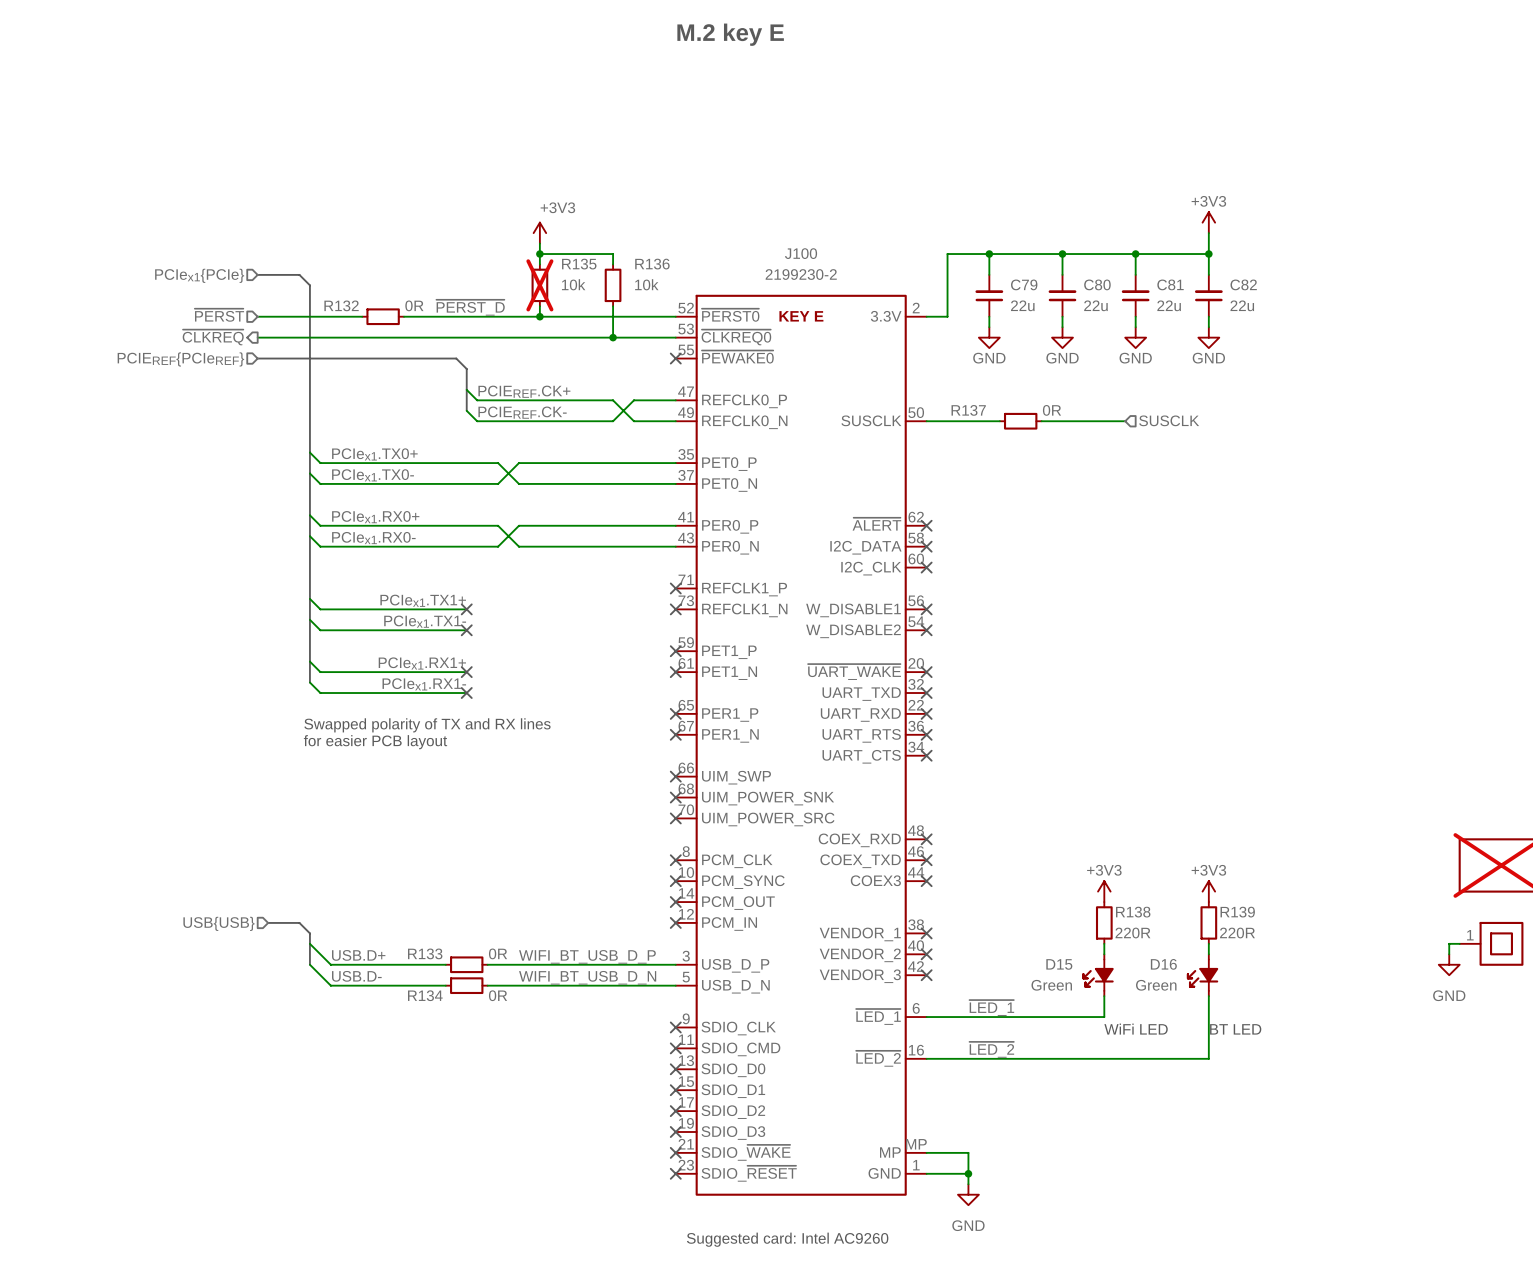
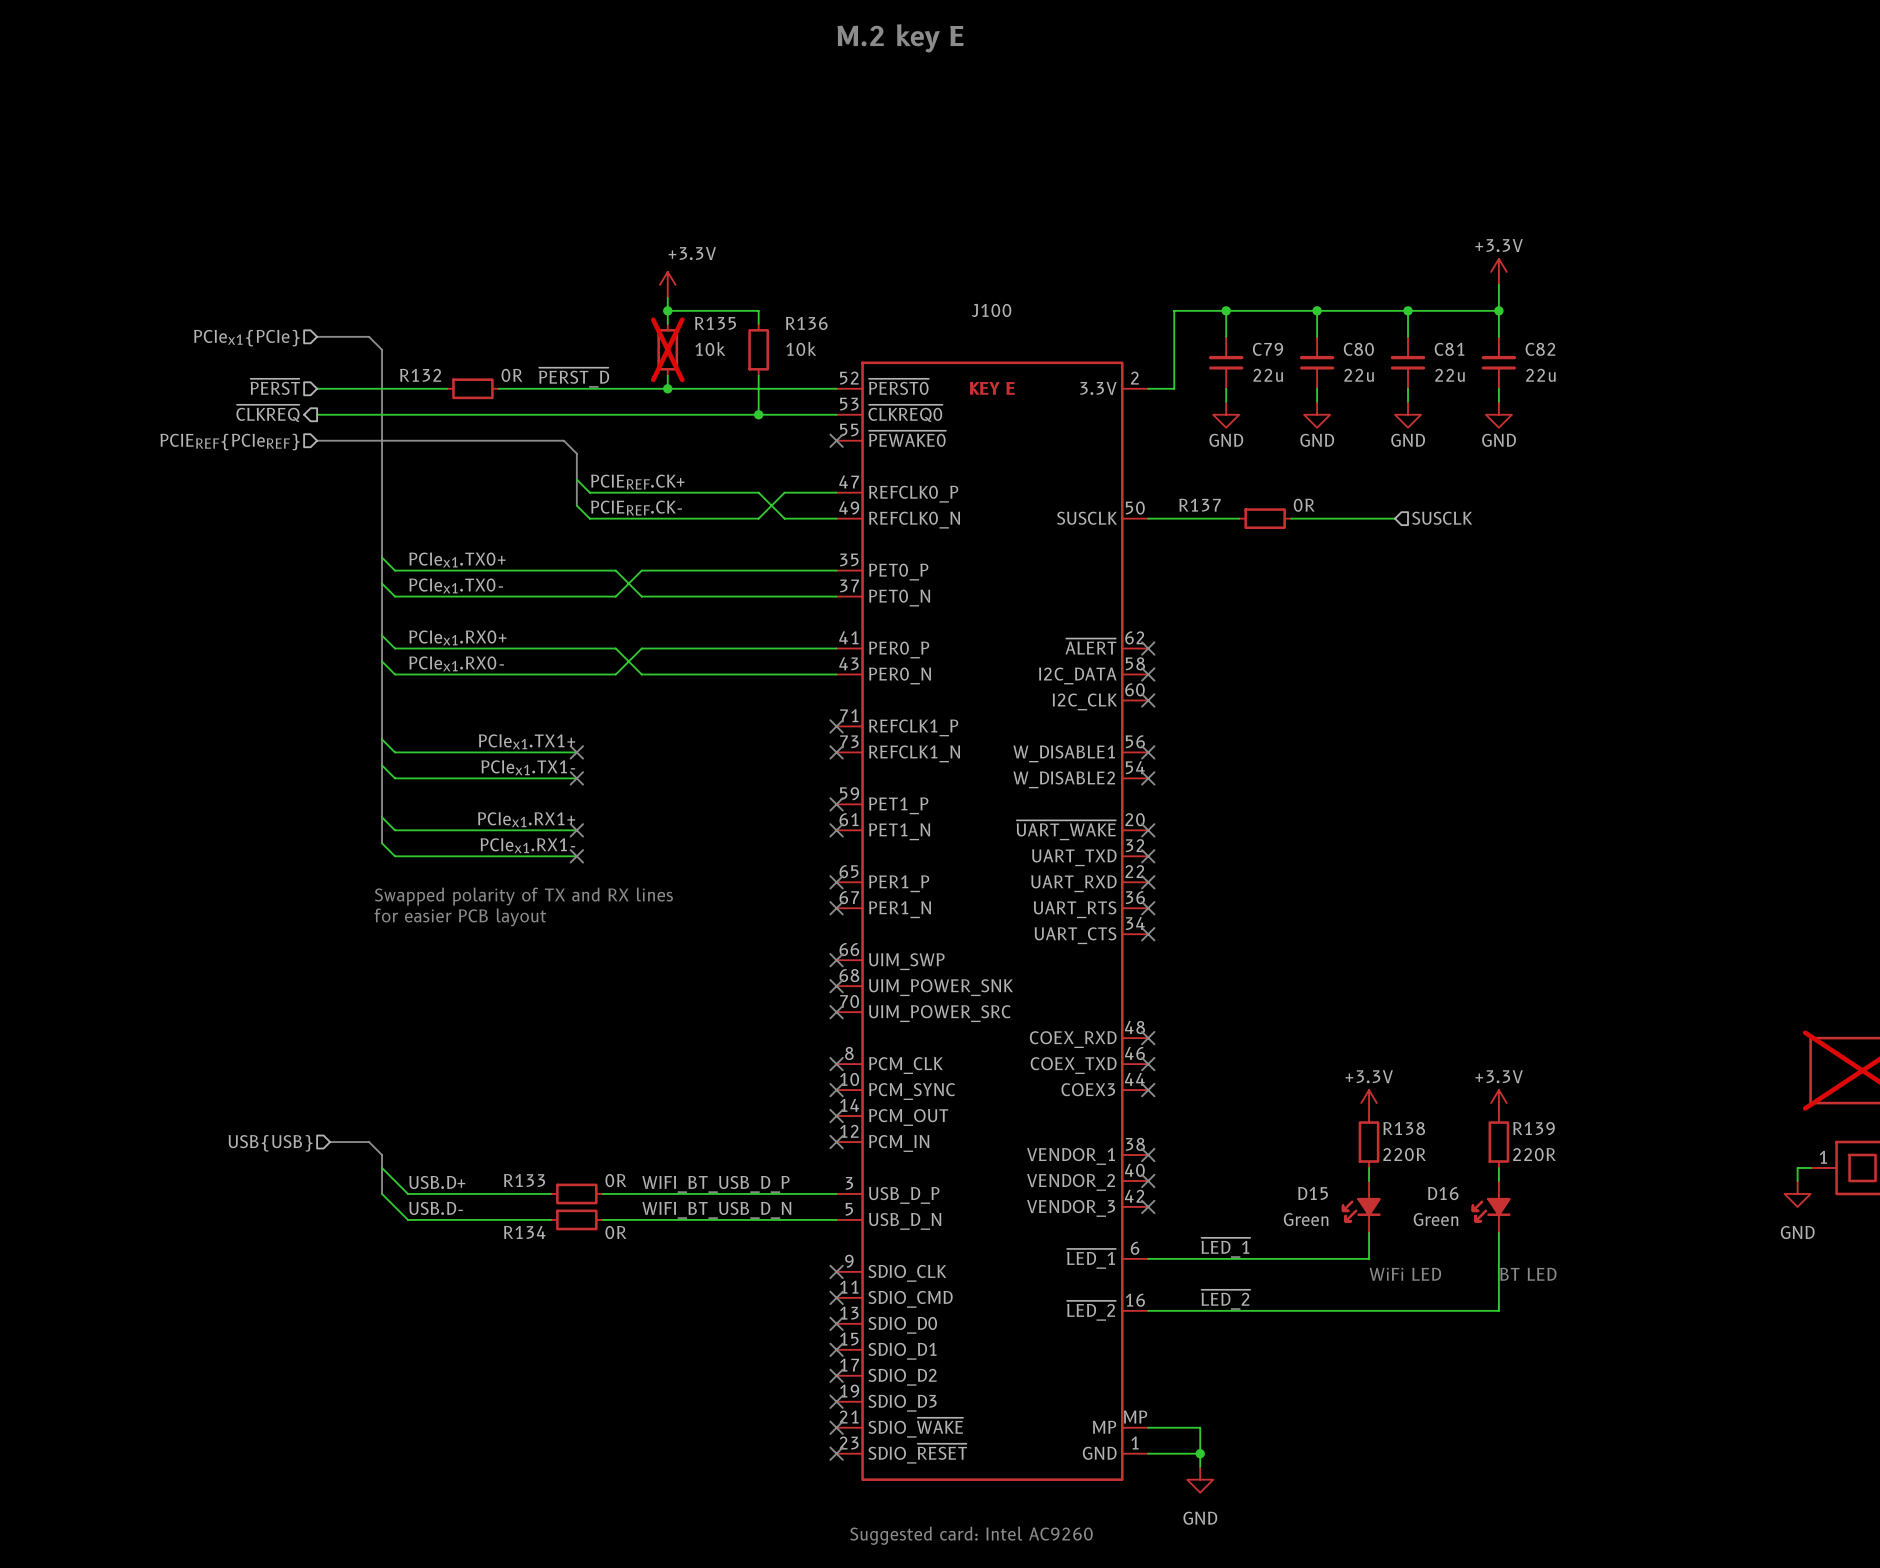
power symbol: +3V3 (1208, 222) -> +3.3V (1498, 271)
power symbol: +3V3 (539, 233) -> +3.3V (667, 284)
J100 text: 2199230-2 (801, 274) -> none
power symbol: +3V3 (1104, 891) -> +3.3V (1369, 1103)
power symbol: +3V3 (1208, 891) -> +3.3V (1498, 1103)

